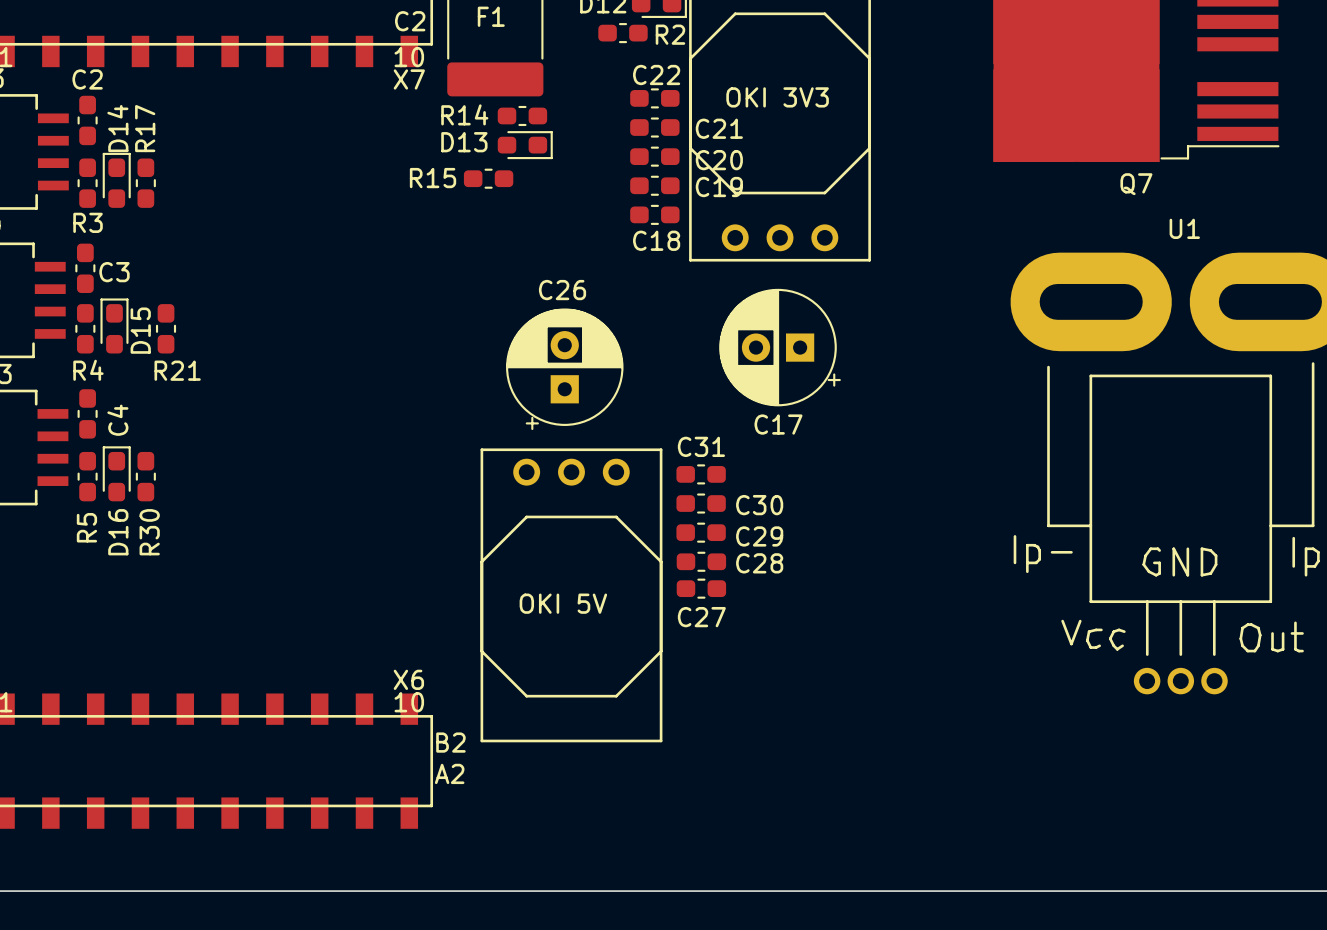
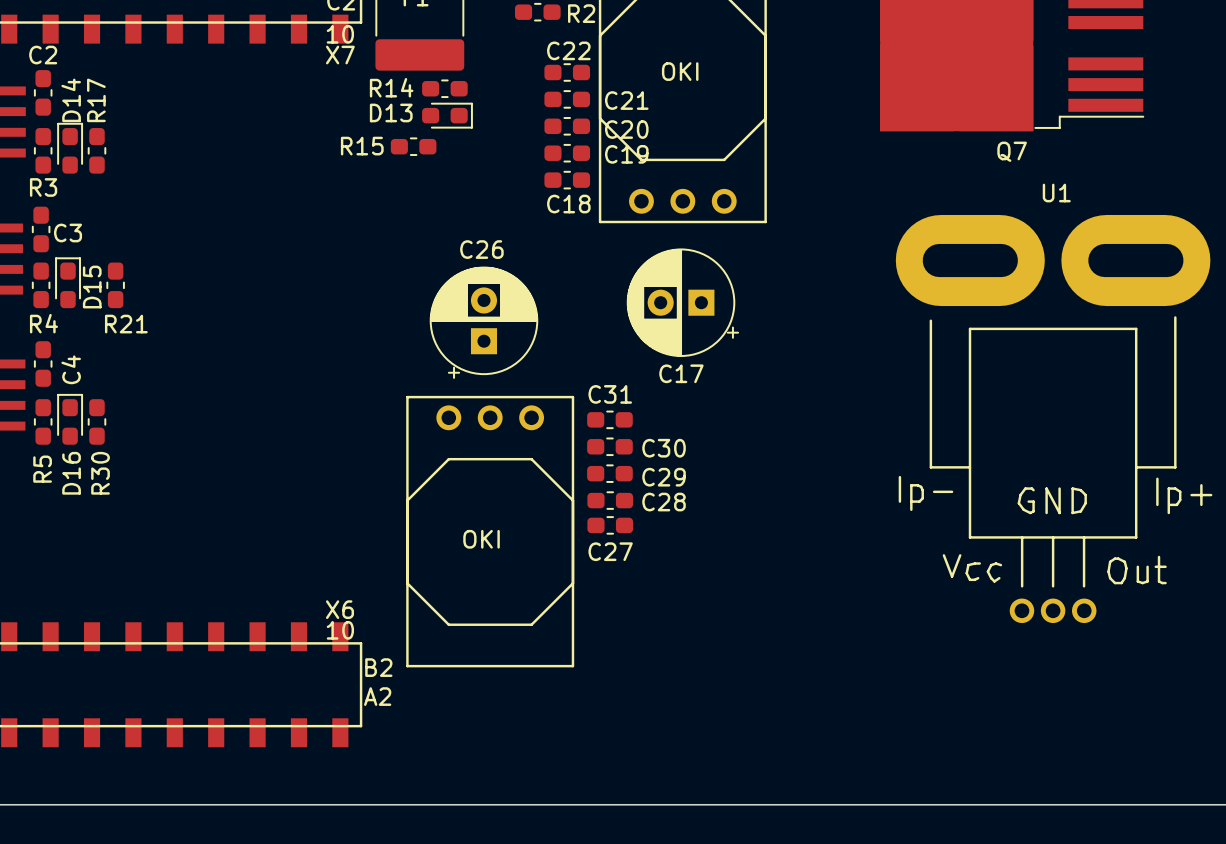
part value: OKI 3V3 (777, 97) -> OKI (680, 71)
part value: OKI 5V (563, 603) -> OKI (481, 539)

